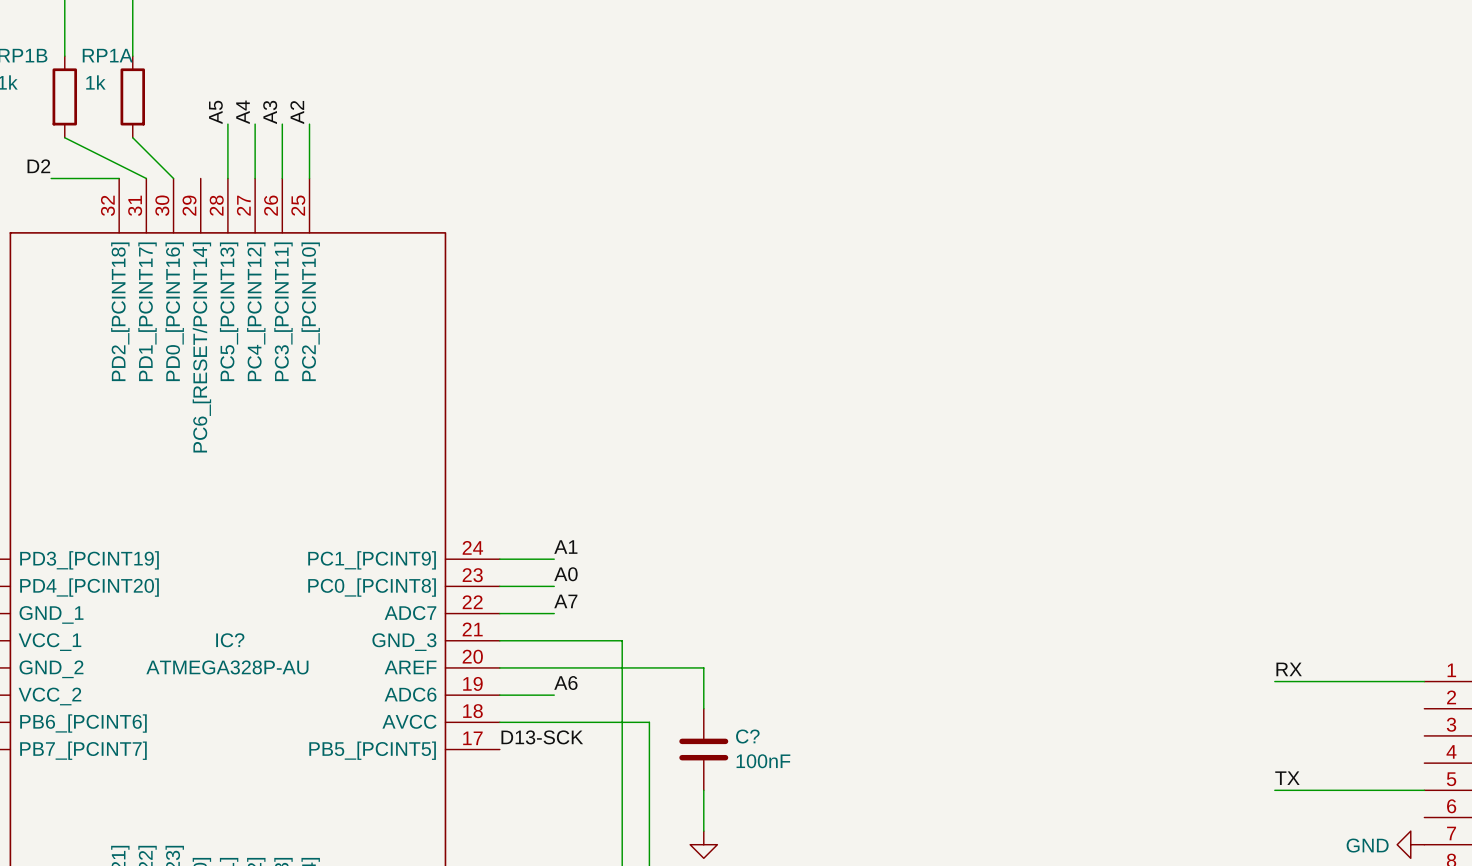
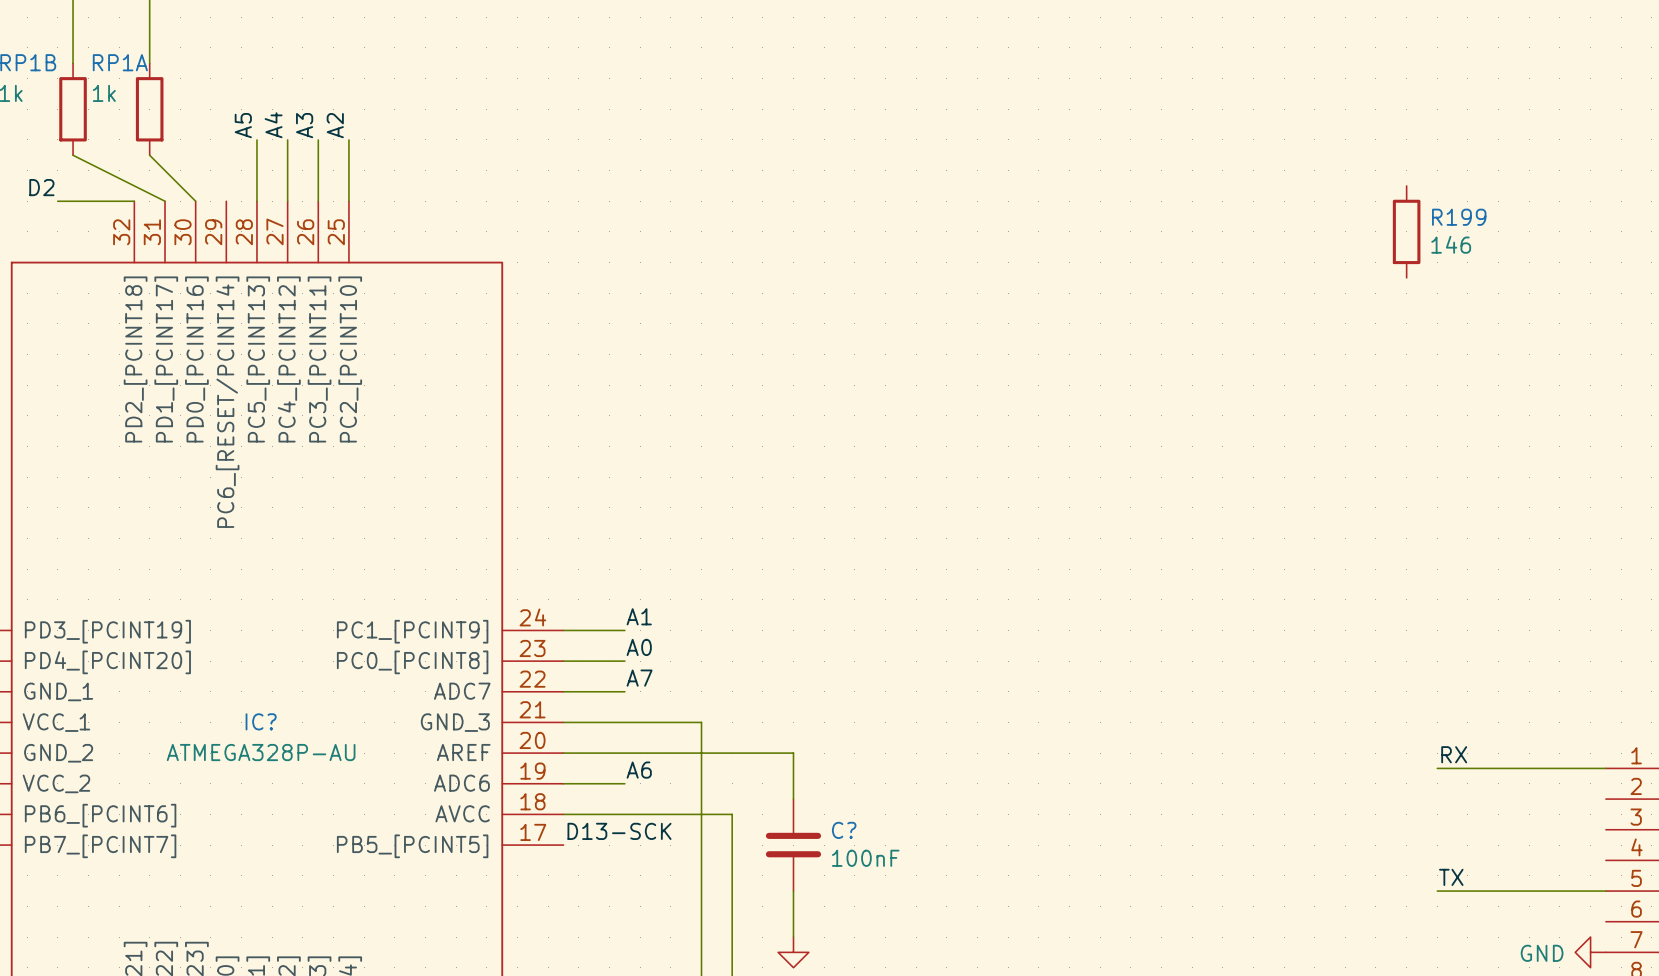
R199: none -> 146 (1406, 231)

